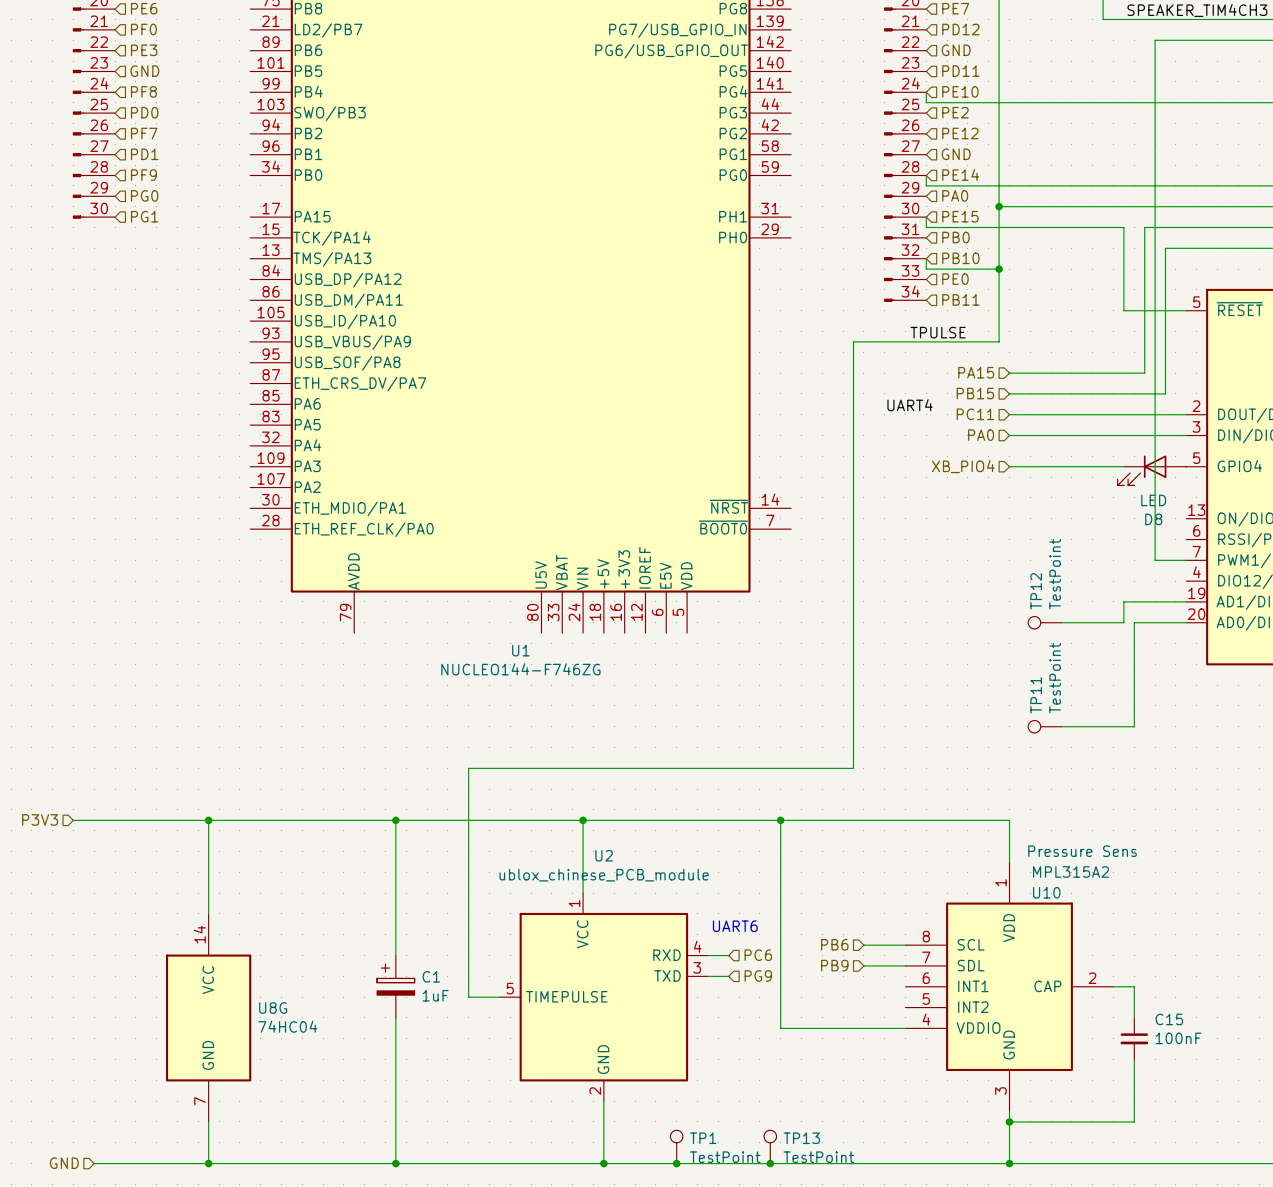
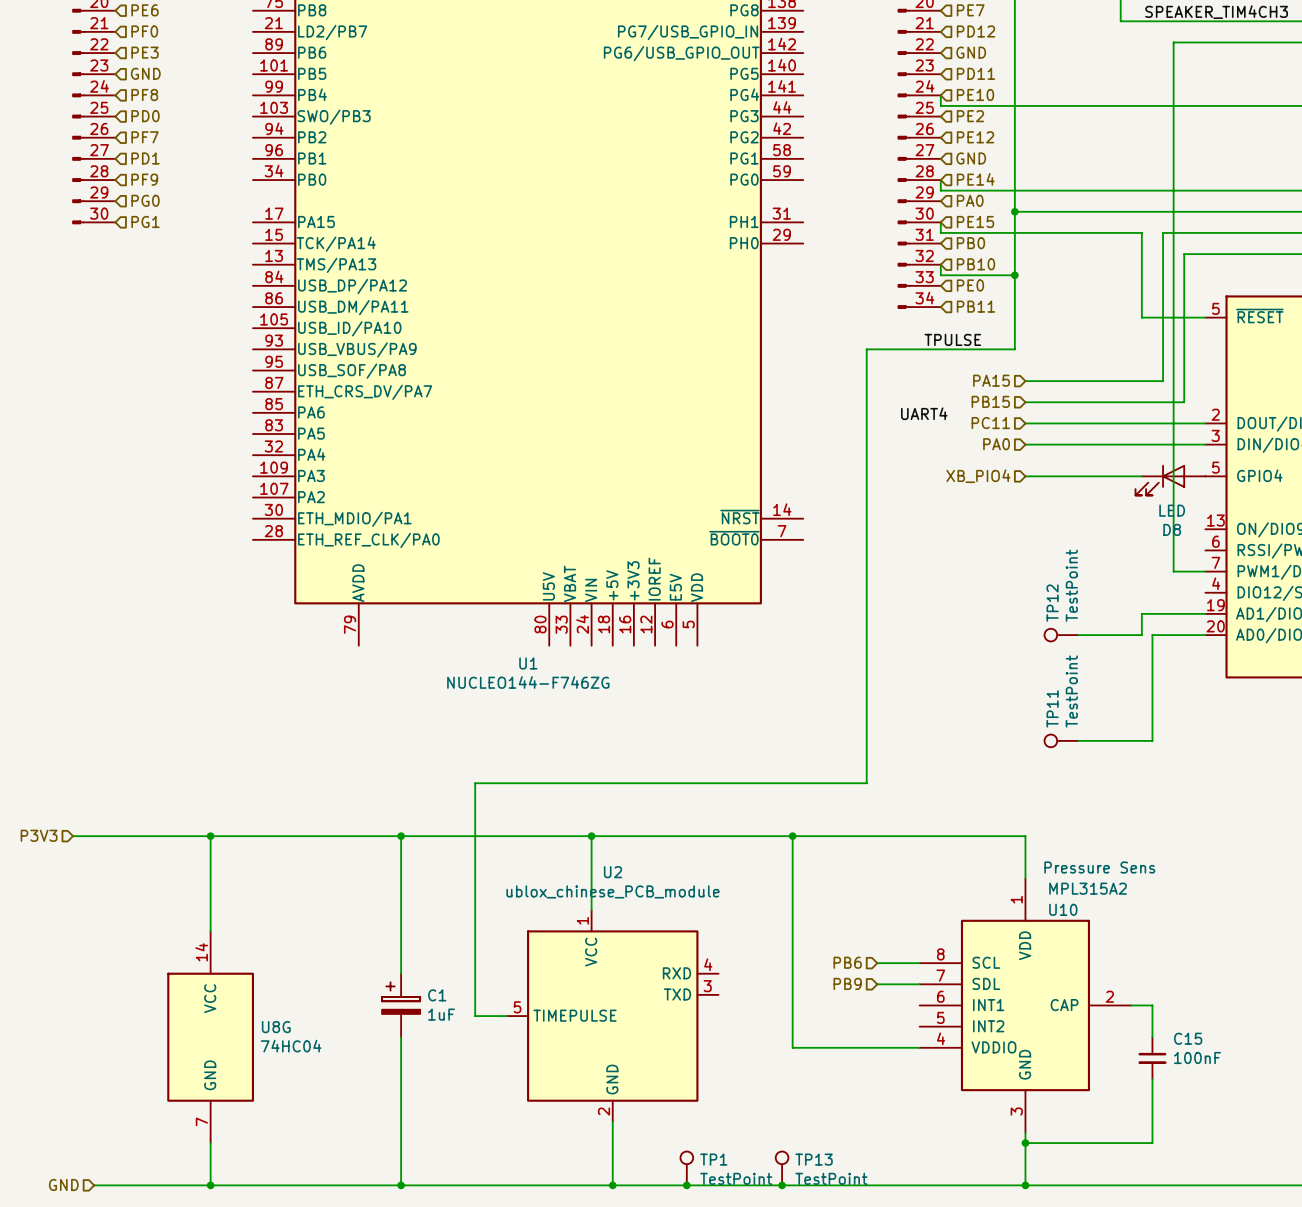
text: UART6 (735, 926) -> none
wire: (707, 955) (728, 955) -> none
hierarchical label: PC6 (758, 955) -> none
hierarchical label: PG9 (758, 975) -> none
wire: (707, 976) (728, 976) -> none

